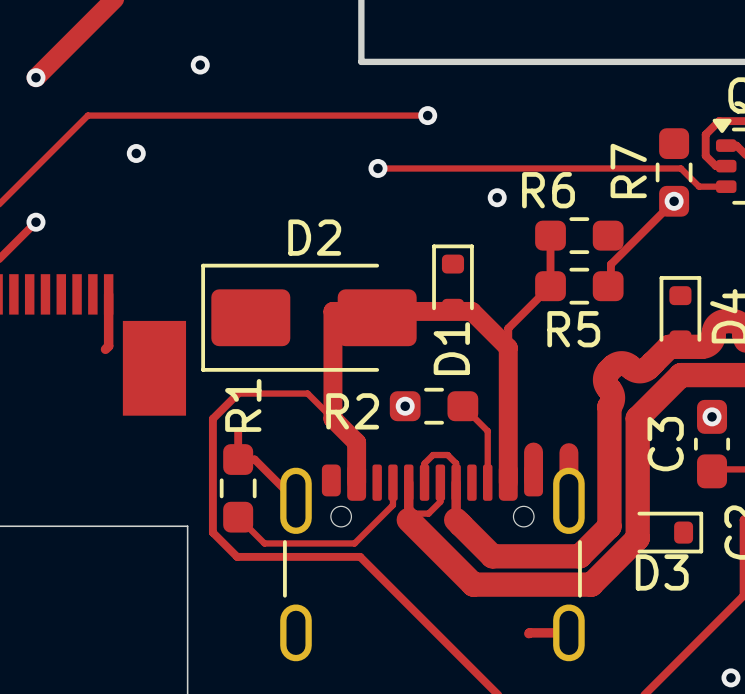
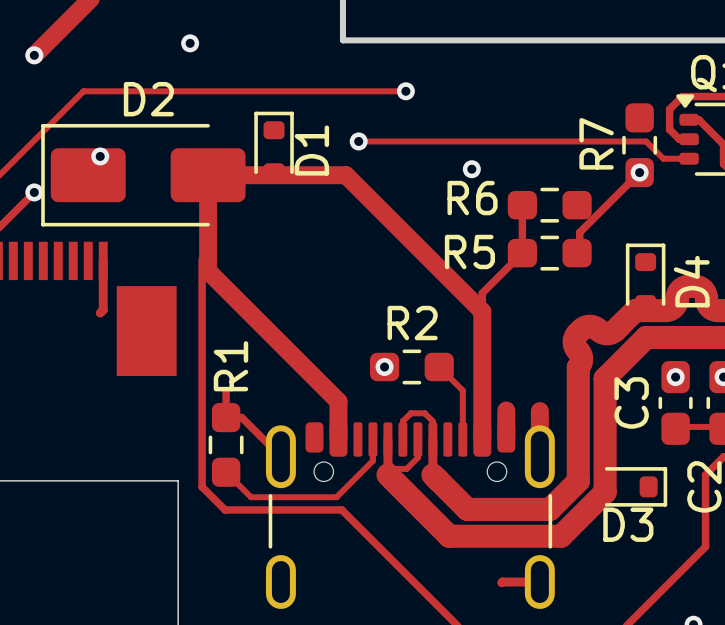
via position: (136, 153) -> (100, 156)
R6 name position: R6 (548, 190) -> R6 (472, 198)
D1 position: (452, 281) -> (274, 146)
track: (471, 311) (332, 311) (332, 418) -> (447, 277) (345, 175) (208, 175) (208, 271) (292, 355)
D2 position: (308, 317) -> (143, 175)
R5 name position: R5 (573, 329) -> R5 (469, 252)
D1 name position: D1 (451, 348) -> D1 (311, 150)
track: (307, 393) (238, 393) (212, 418) -> (202, 259) (202, 378)
track width: thin (307, 393) (332, 418) -> thick (292, 355) (316, 378)
R2 name position: R2 (352, 411) -> R2 (412, 323)

